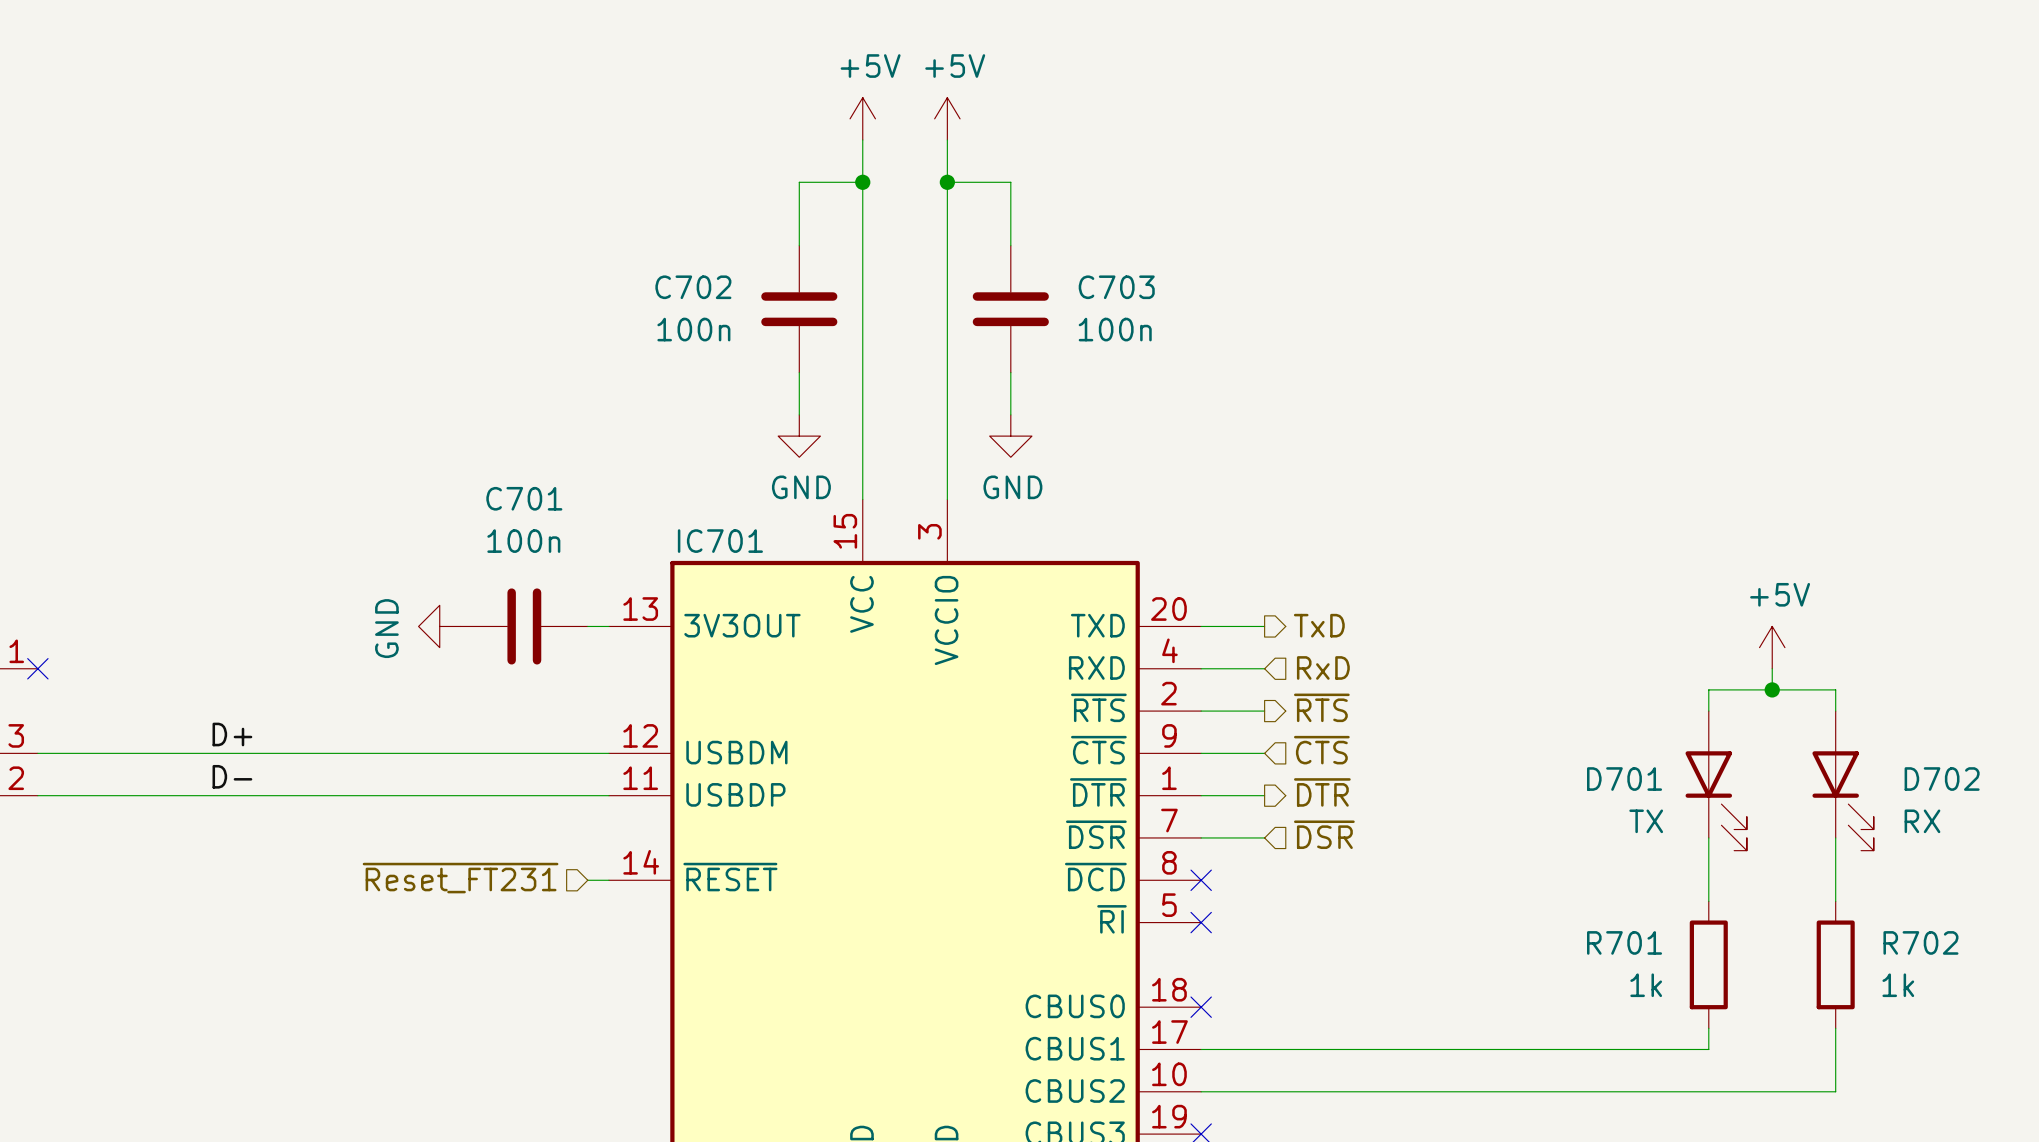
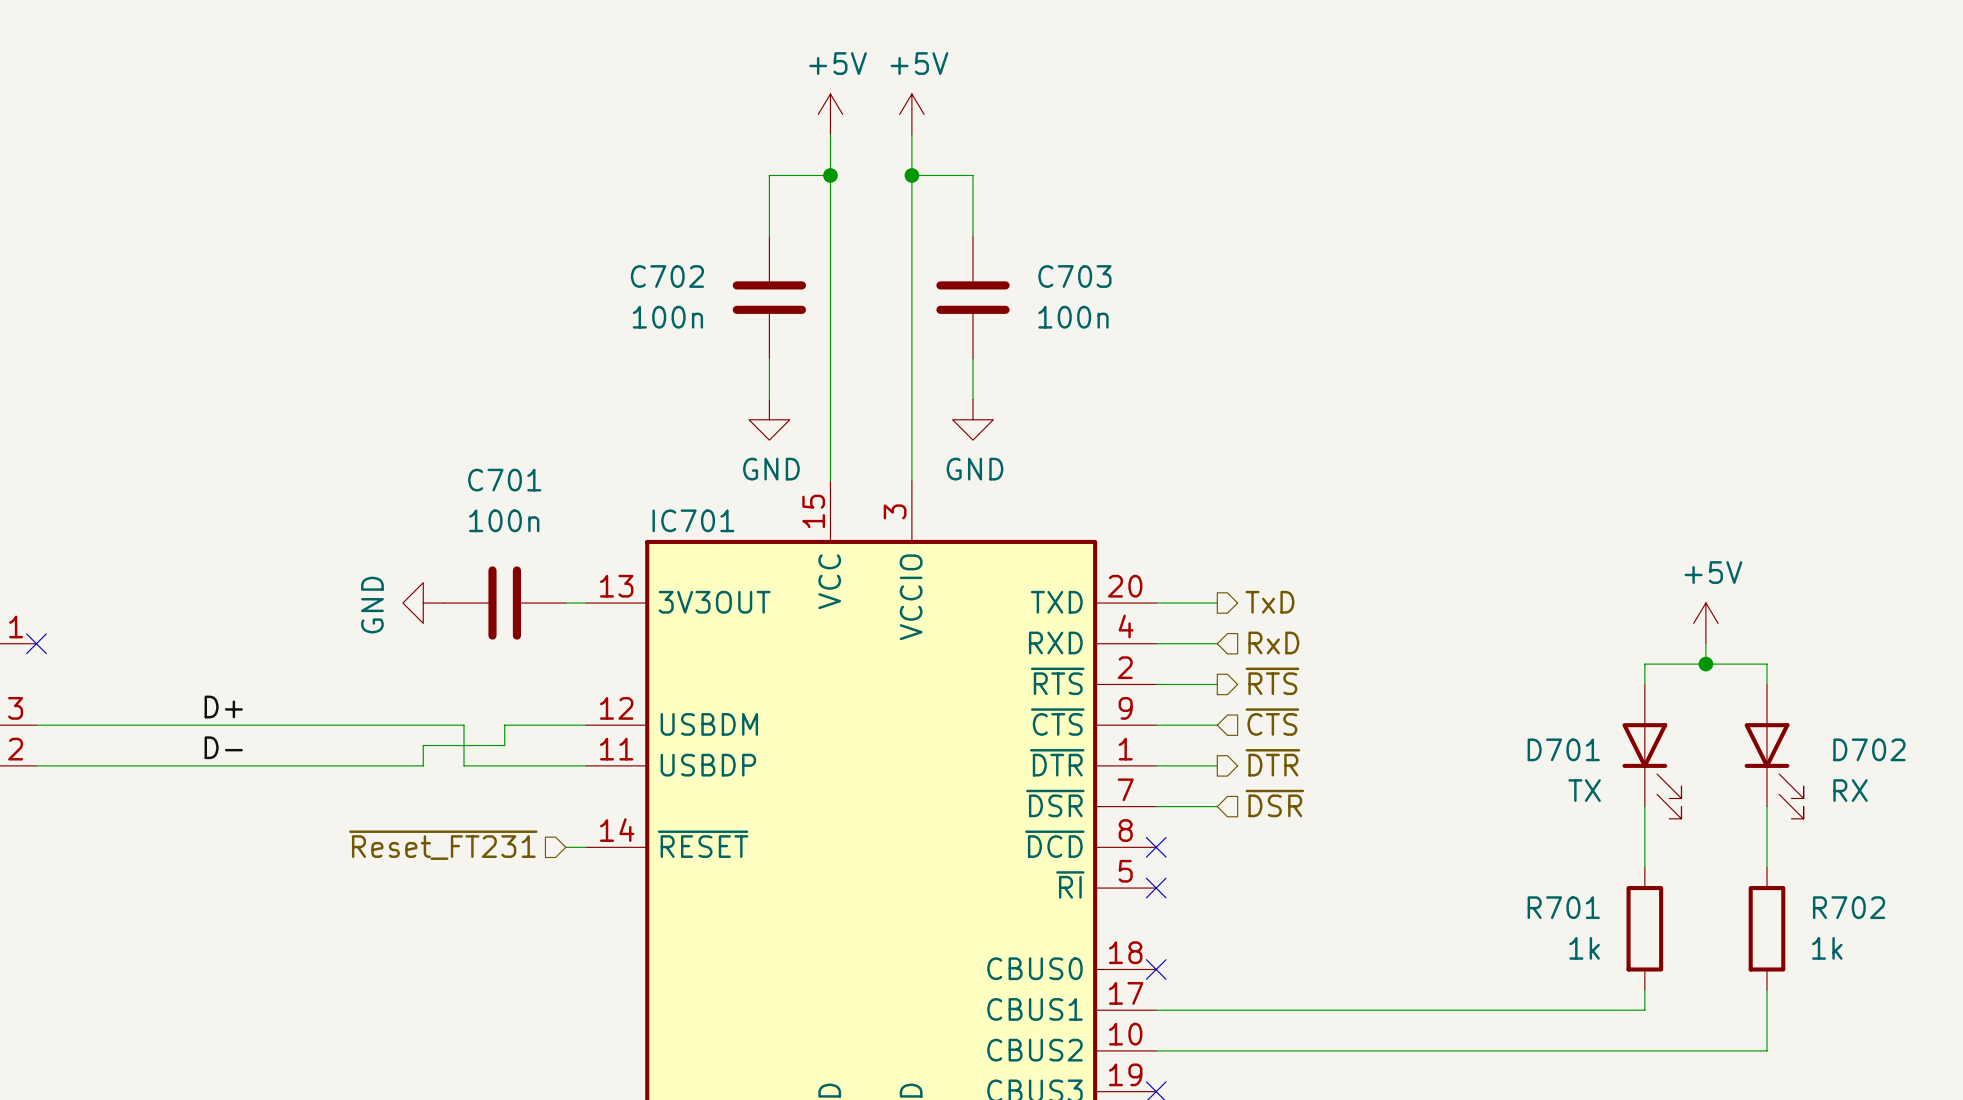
wire: (482, 753) (524, 753) -> (423, 765) (423, 745) (504, 745) (504, 725)
wire: (439, 795) (482, 795) -> (464, 725) (464, 765)

